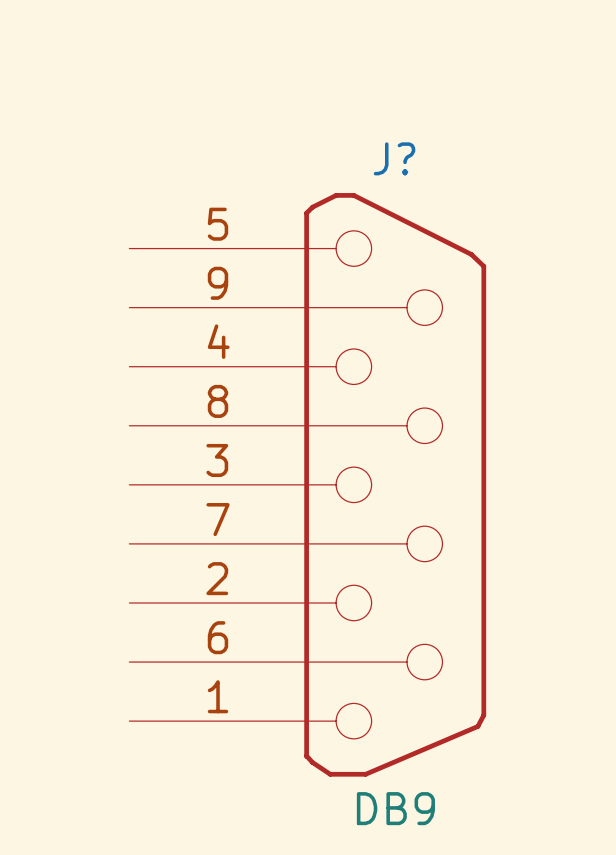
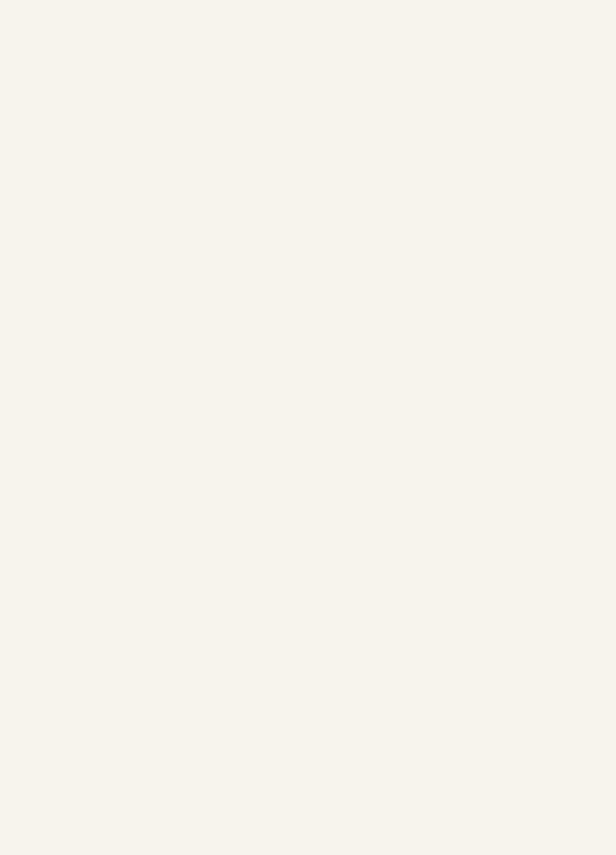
J?: DB9 (307, 484) -> none

